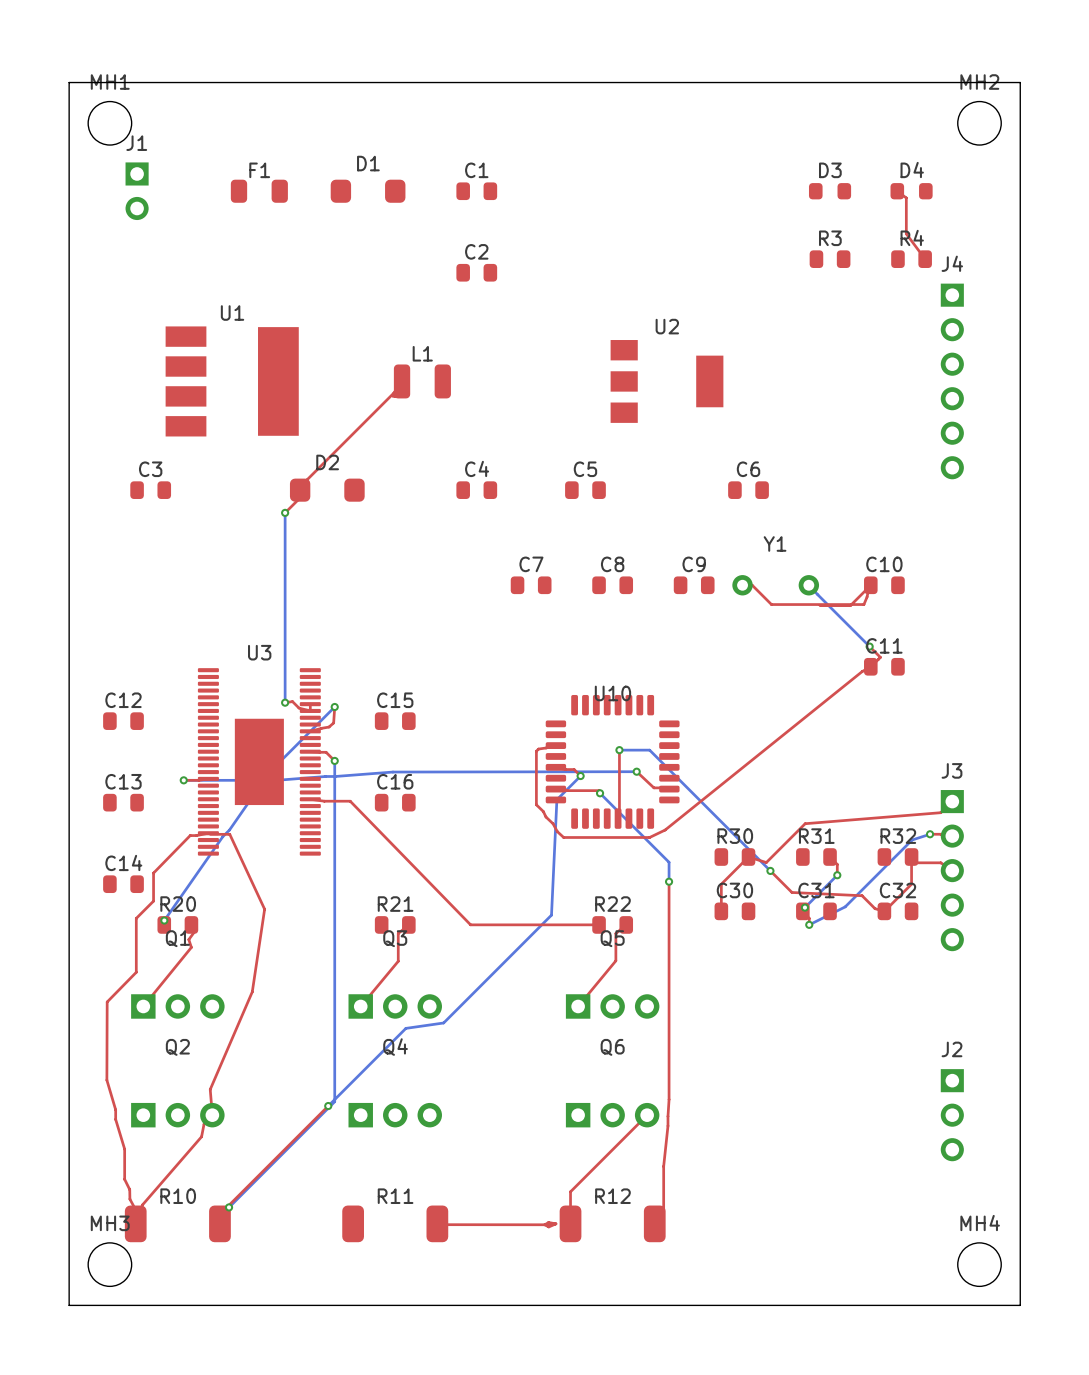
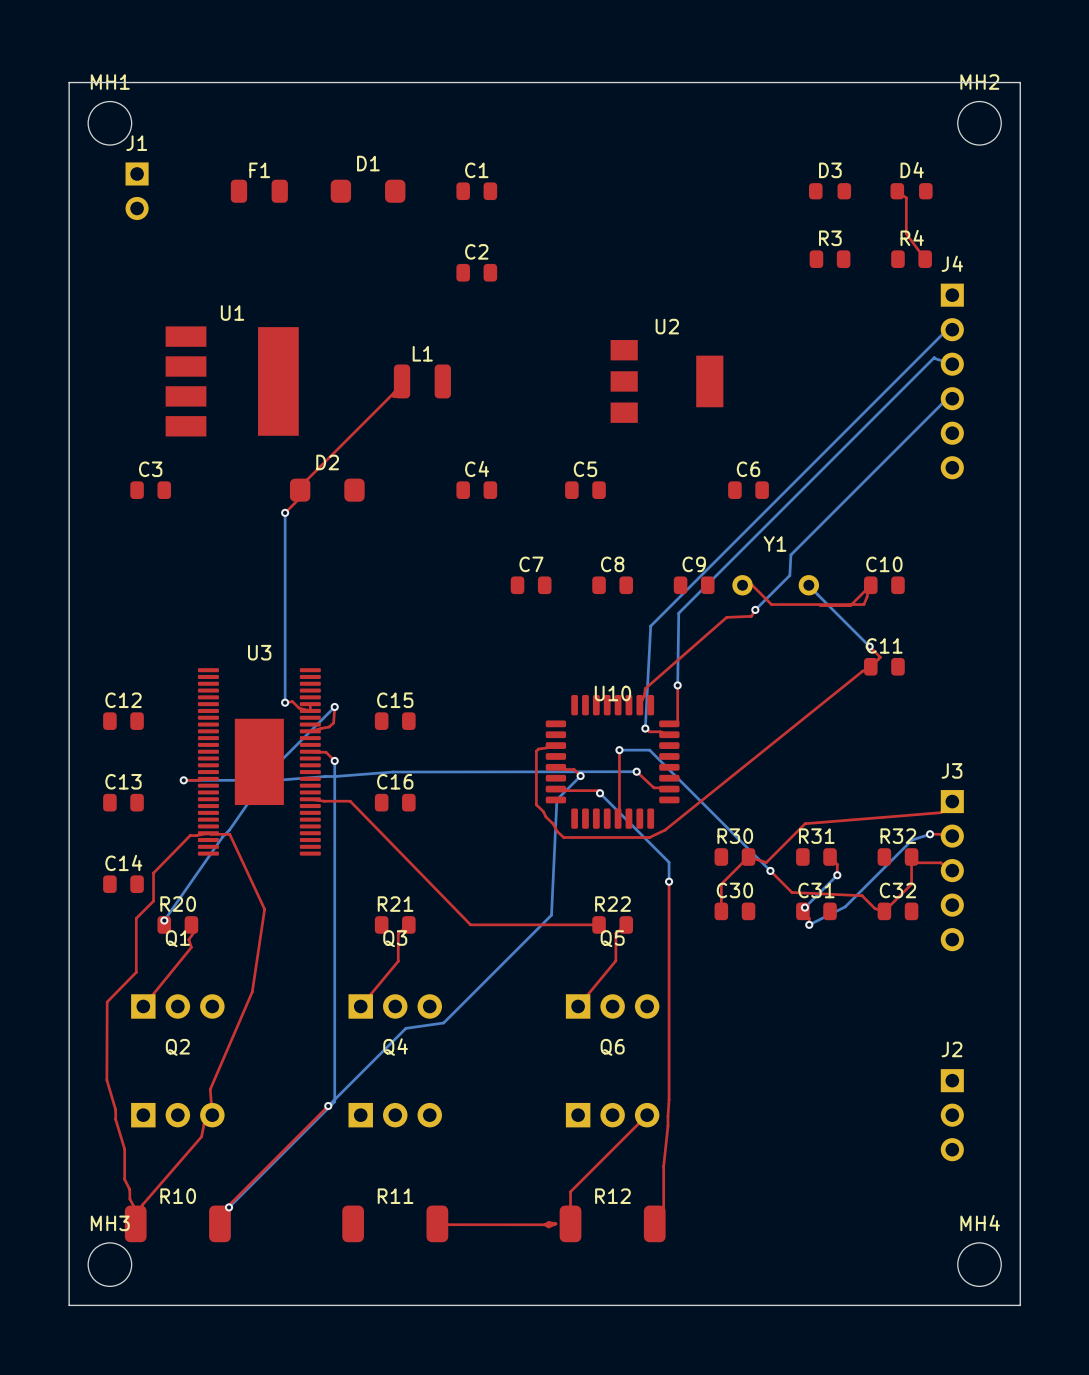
bottom track: none -> (952, 329) (946, 330) (650, 626) (645, 728)
bottom track: none -> (952, 364) (934, 357) (678, 613) (677, 685)
bottom track: none -> (952, 398) (941, 403) (790, 554) (789, 575) (755, 609)
top track: none -> (755, 609) (751, 616) (726, 617) (645, 688) (639, 705)
via: none -> (755, 609)
top track: none -> (677, 685) (677, 722) (669, 723)
via: none -> (677, 685)
top track: none -> (645, 728) (649, 731) (660, 731) (669, 734)
via: none -> (645, 728)

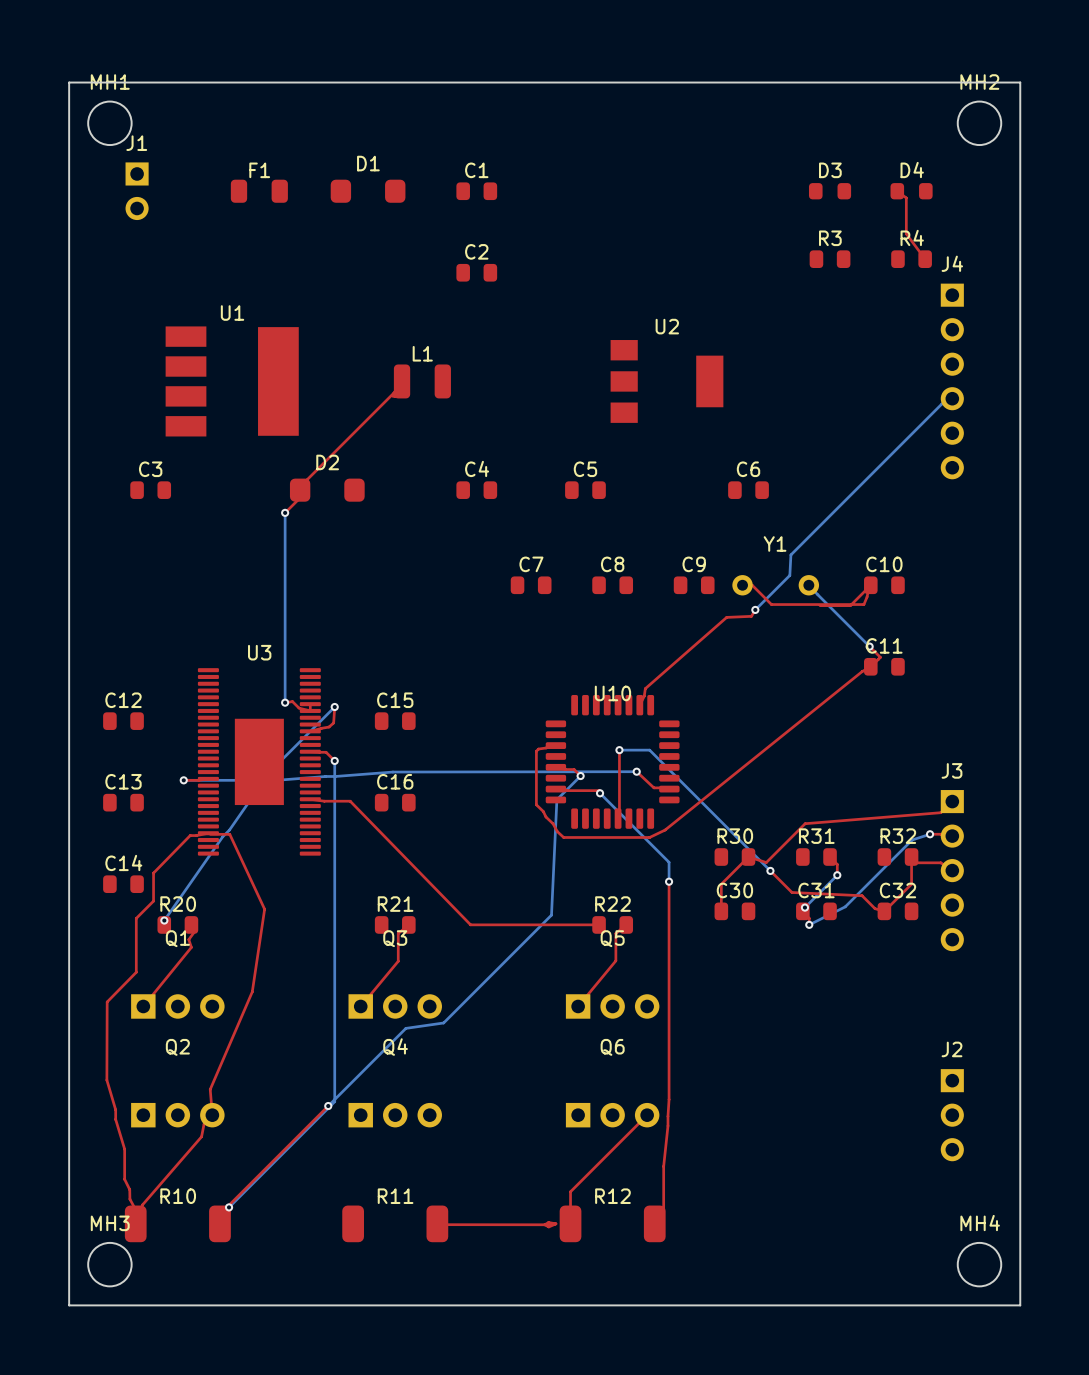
bottom track: (952, 329) (946, 330) (650, 626) (645, 728) -> none
bottom track: (952, 364) (934, 357) (678, 613) (677, 685) -> none
top track: (677, 685) (677, 722) (669, 723) -> none
via: (677, 685) -> none
top track: (645, 728) (649, 731) (660, 731) (669, 734) -> none
via: (645, 728) -> none

